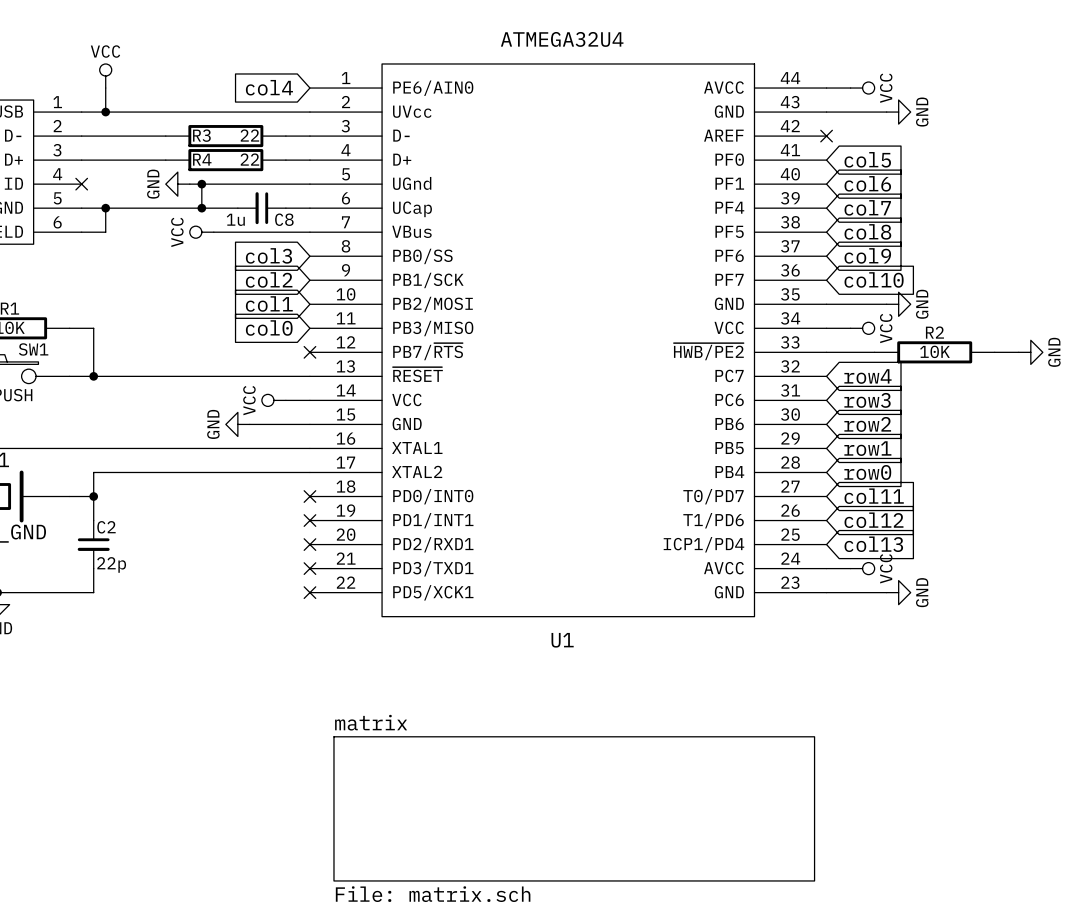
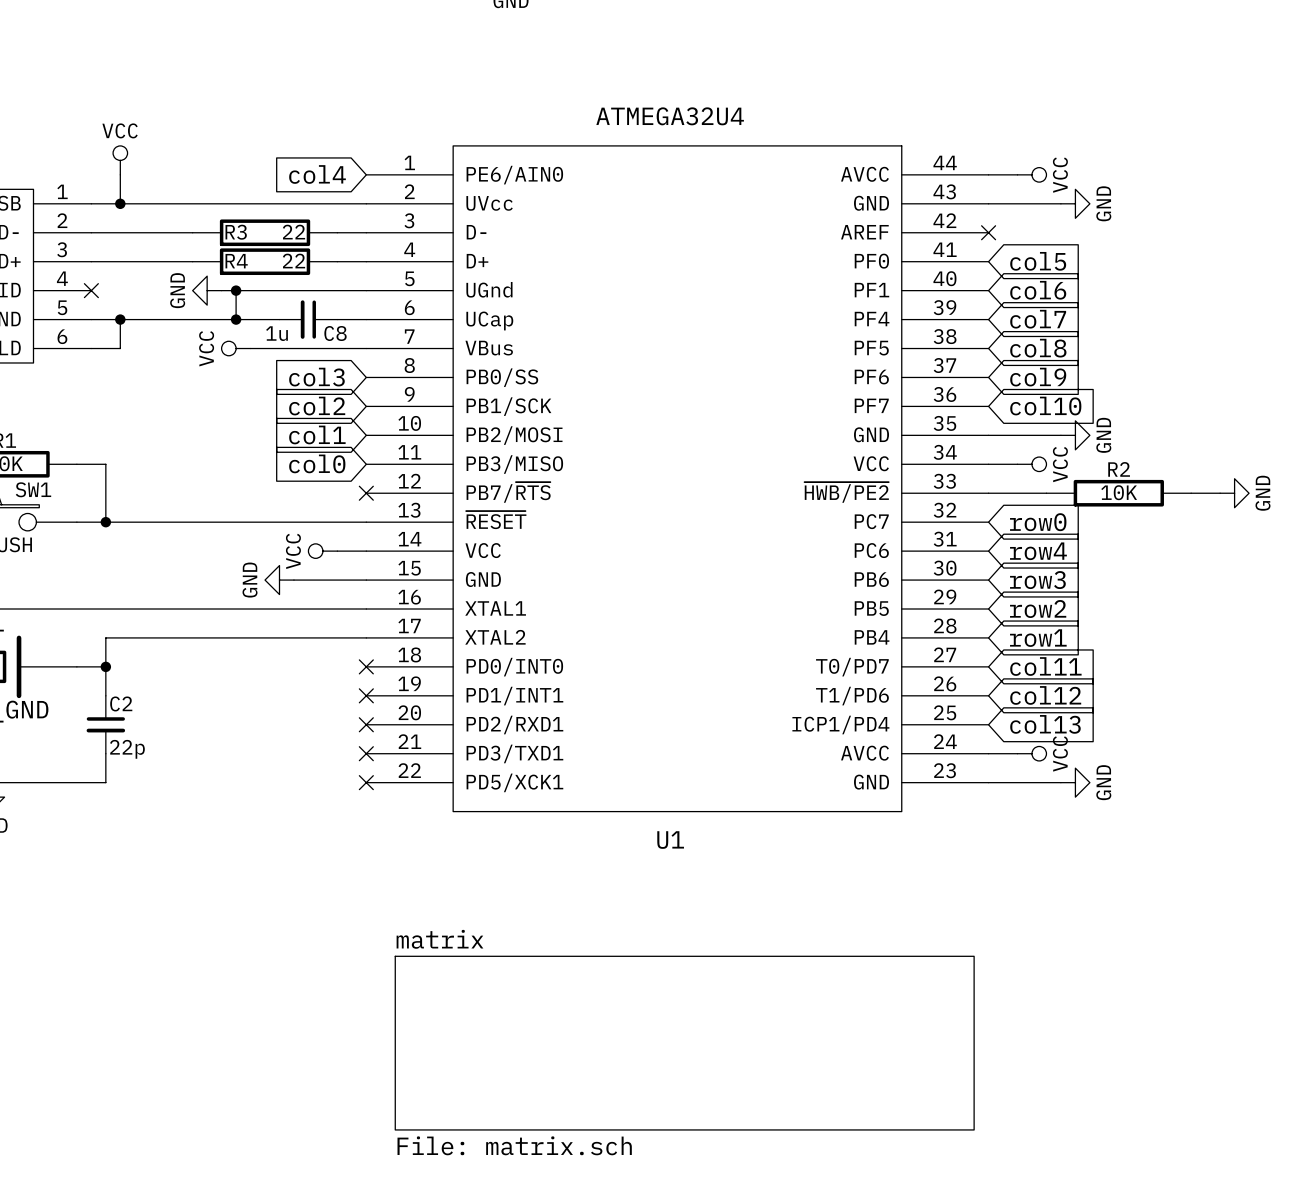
global label: row4 (867, 376) -> row0 (1038, 522)
global label: row3 (867, 400) -> row4 (1038, 551)
global label: row2 (867, 424) -> row3 (1037, 580)
global label: row1 (867, 448) -> row2 (1038, 609)
global label: row0 (867, 472) -> row1 (1038, 638)

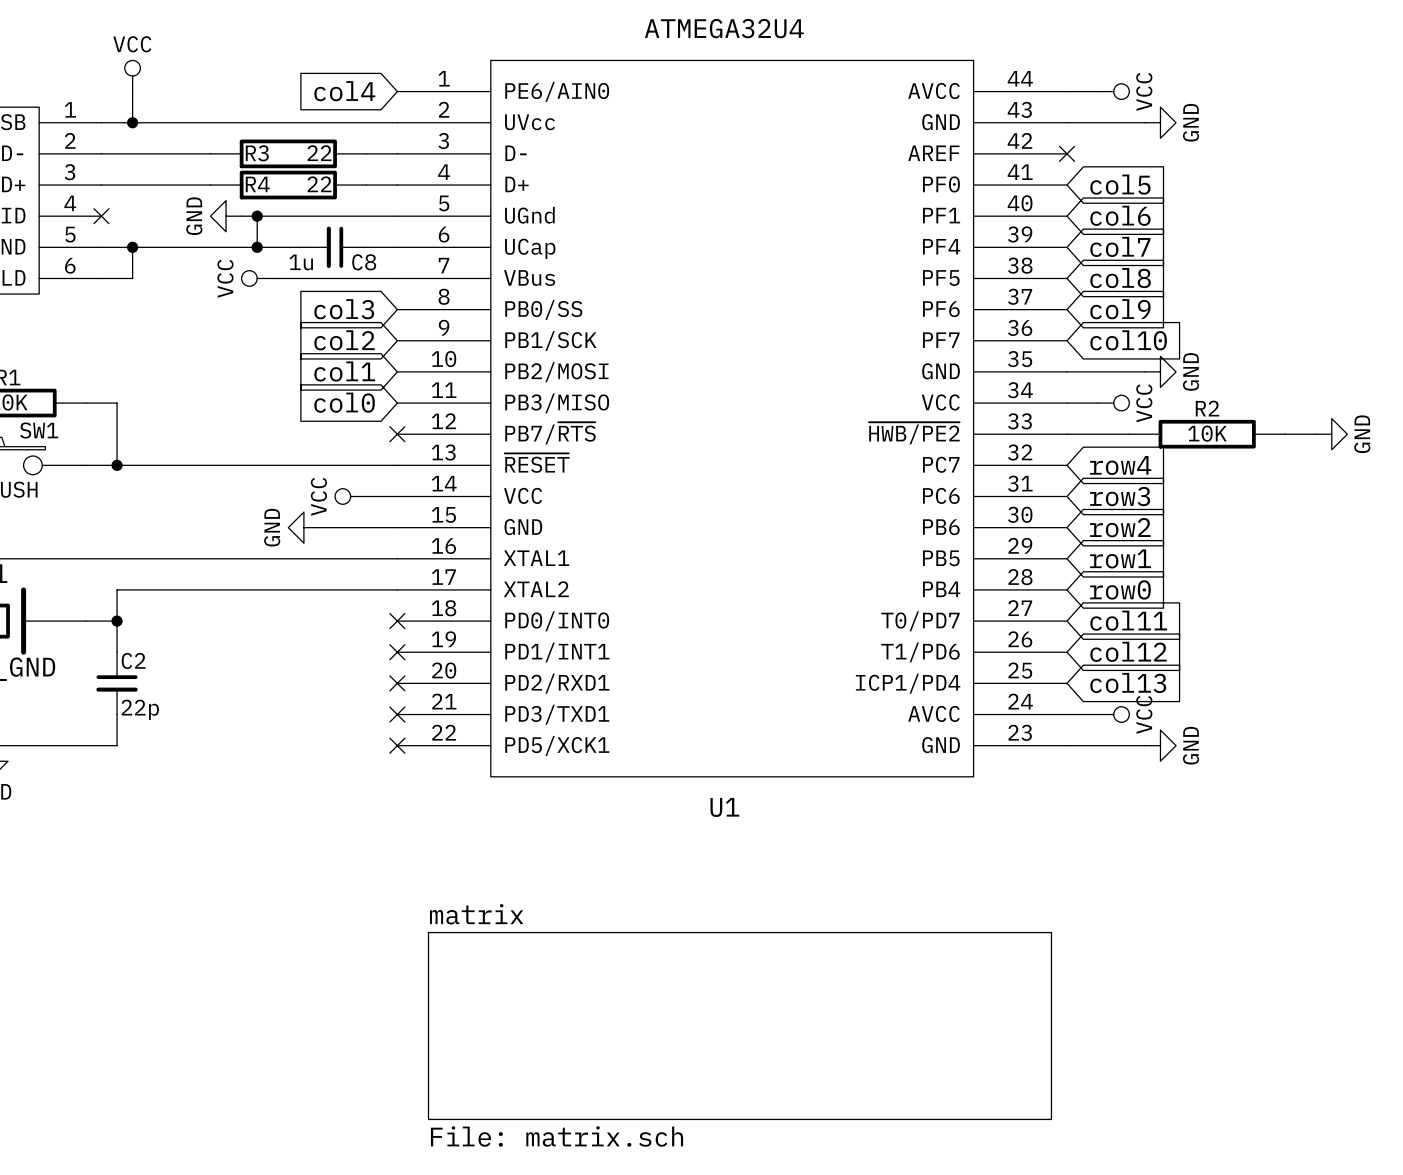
global label: row0 (1038, 522) -> row4 (1120, 465)
global label: row4 (1038, 551) -> row3 (1120, 496)
global label: row3 (1037, 580) -> row2 (1120, 527)
global label: row2 (1038, 609) -> row1 (1120, 558)
global label: row1 (1038, 638) -> row0 (1120, 589)

